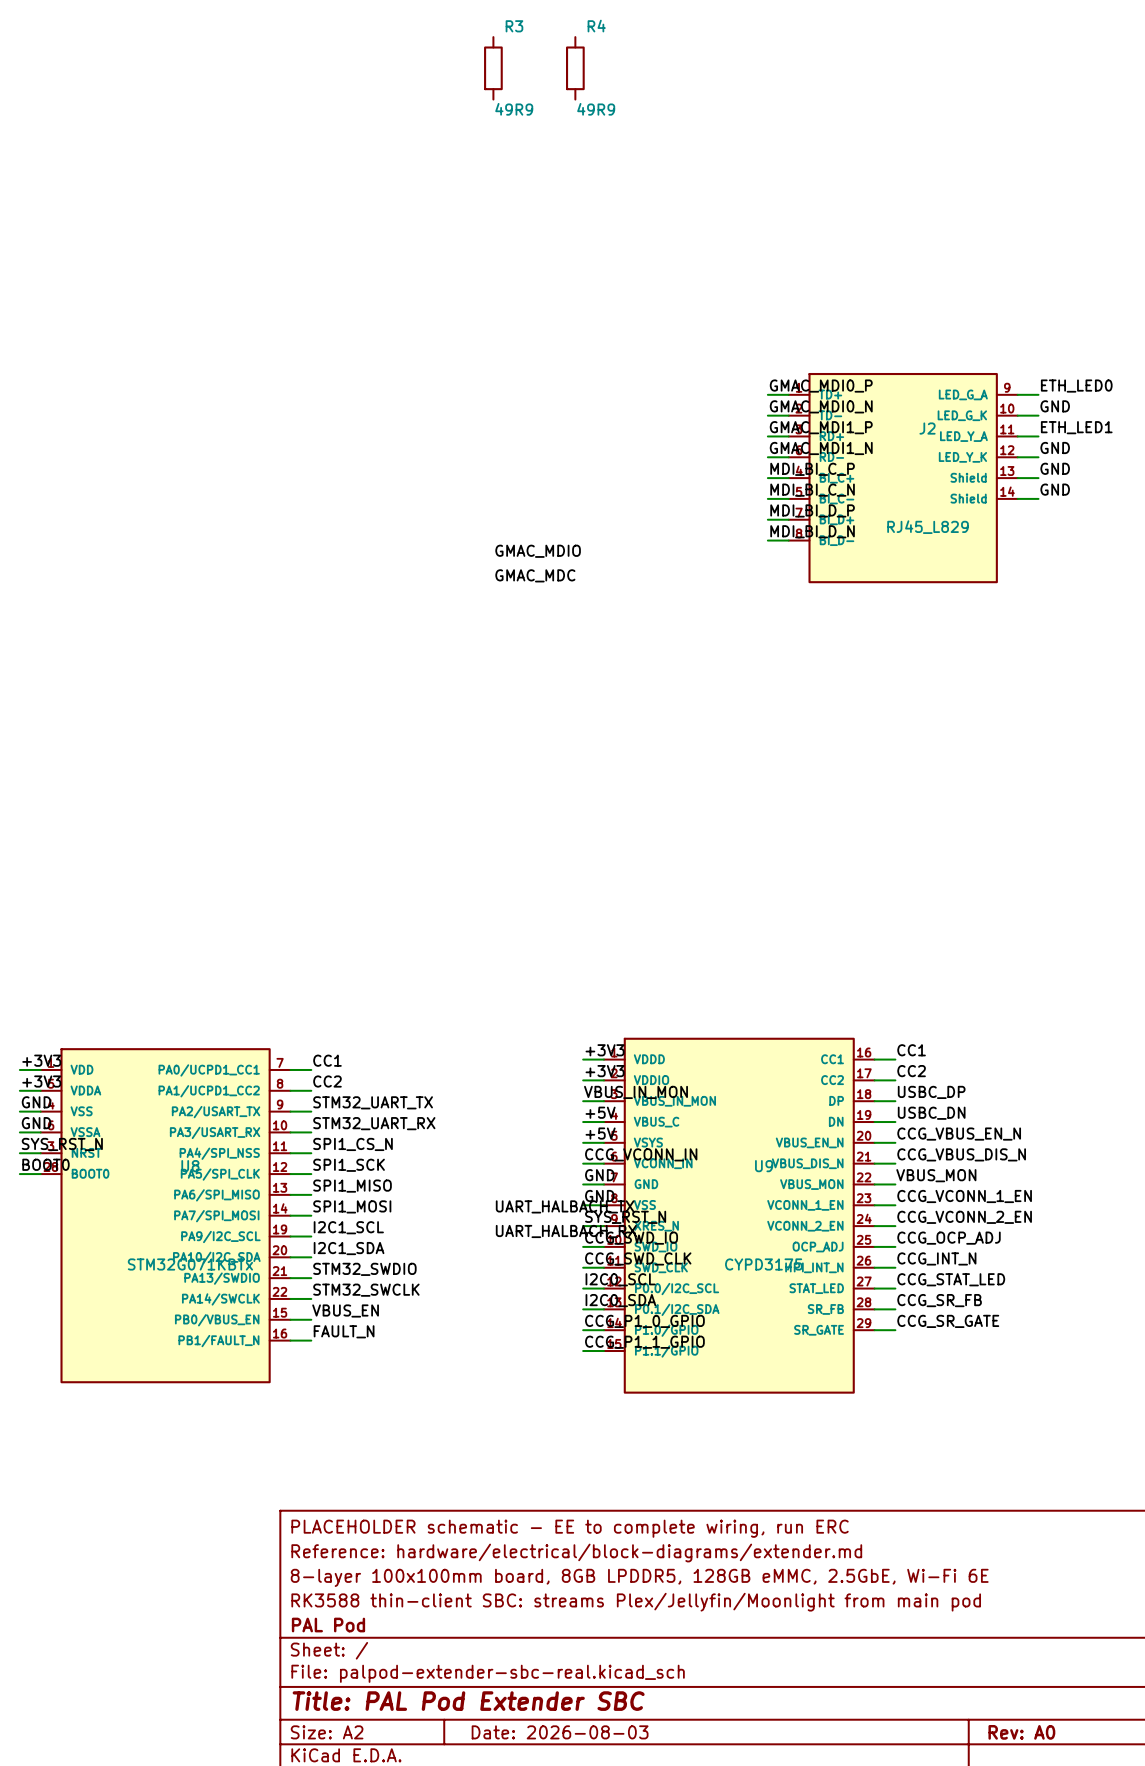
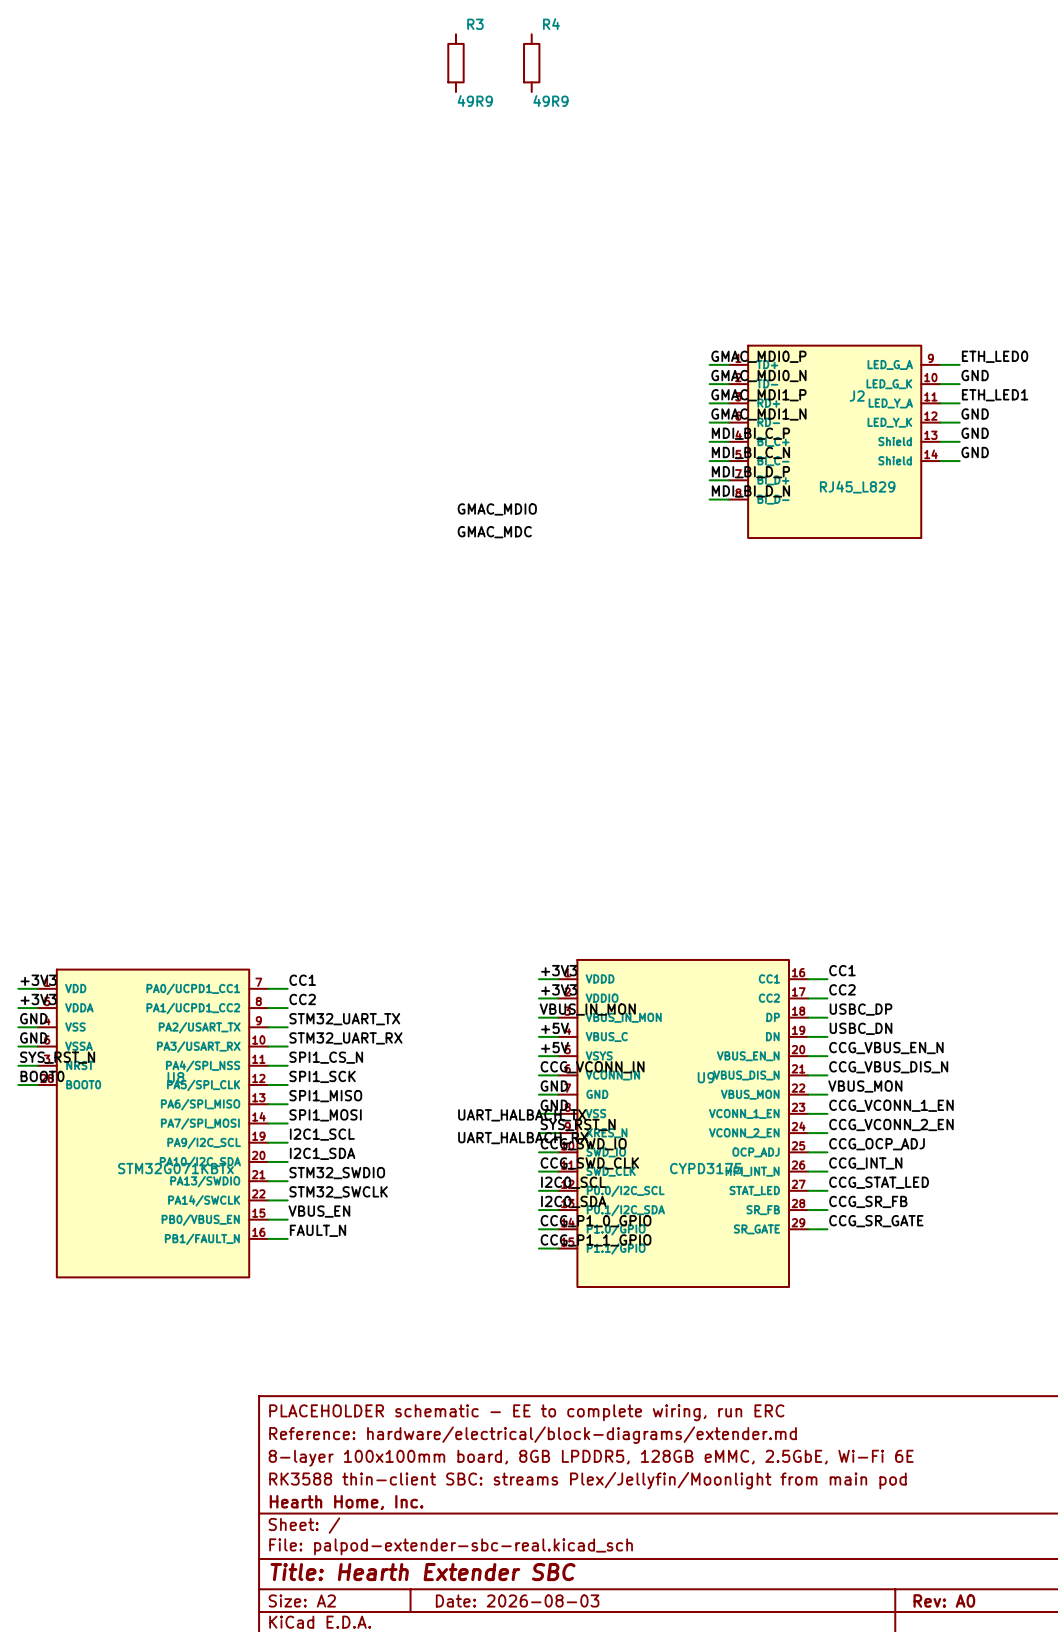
title block: PAL Pod (328, 1625) -> Hearth Home, Inc. (346, 1502)
title block: Title: PAL Pod Extender SBC (468, 1701) -> Title: Hearth Extender SBC (422, 1572)

